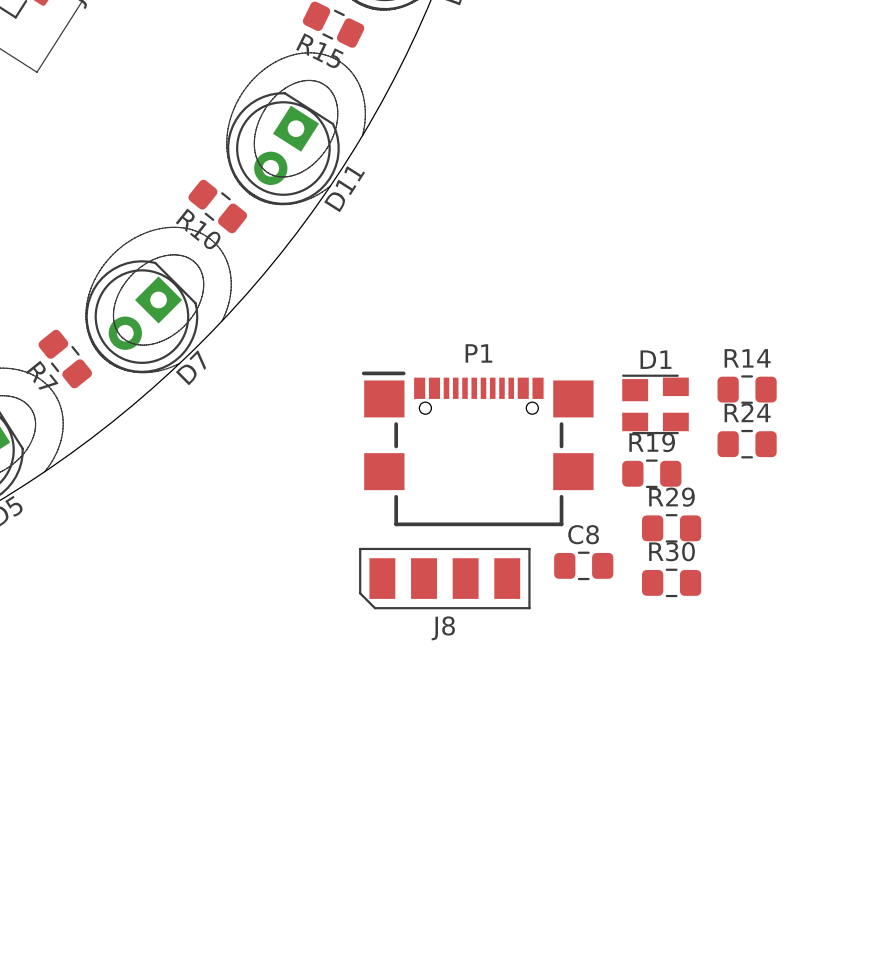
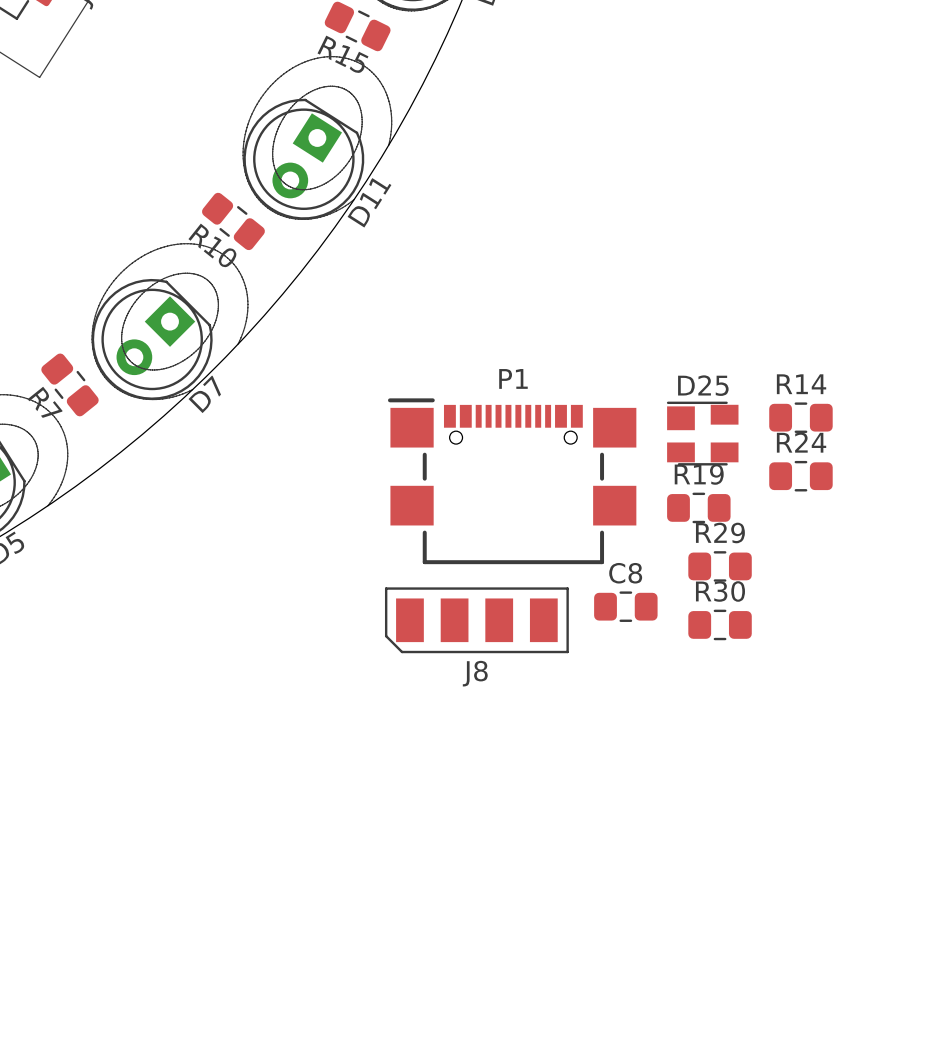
D1 name: D1 (655, 359) -> D25 (703, 385)

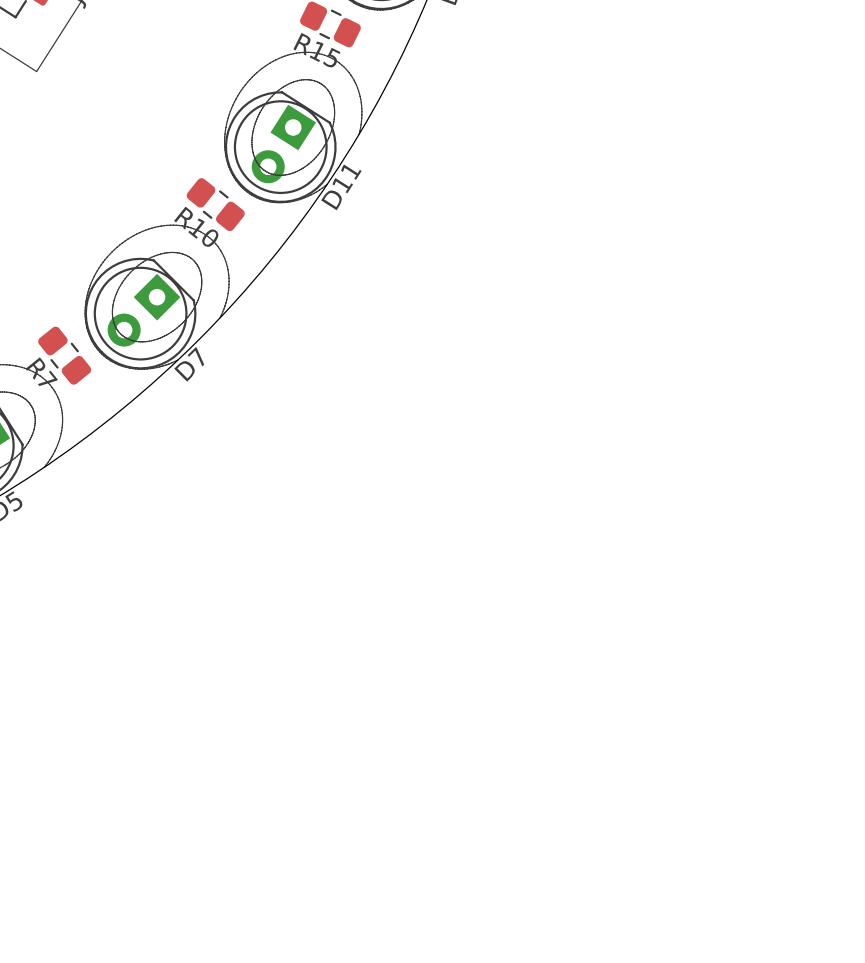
R14: (800, 417) -> none
D25: (702, 433) -> none
R24: (800, 476) -> none
P1: (512, 481) -> none
R19: (698, 507) -> none
R29: (720, 566) -> none
C8: (625, 606) -> none
J8: (476, 620) -> none
R30: (720, 624) -> none

